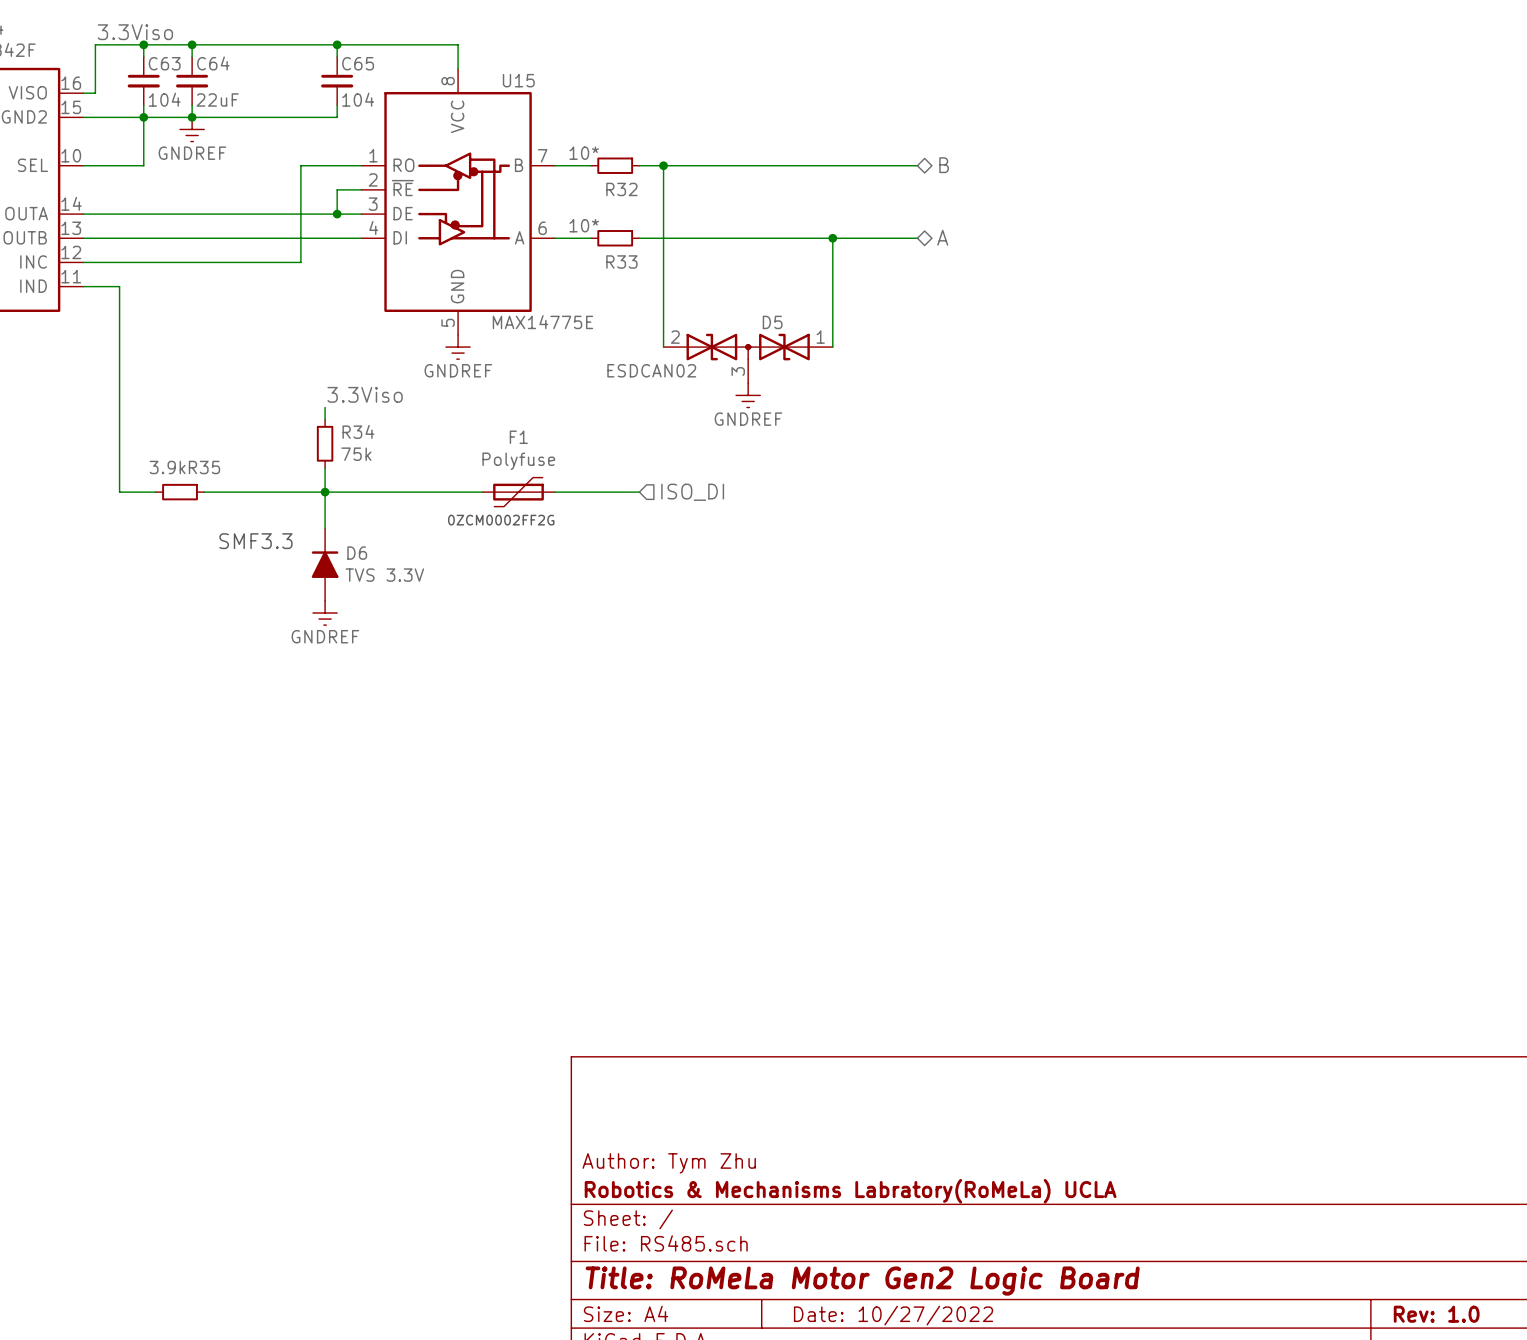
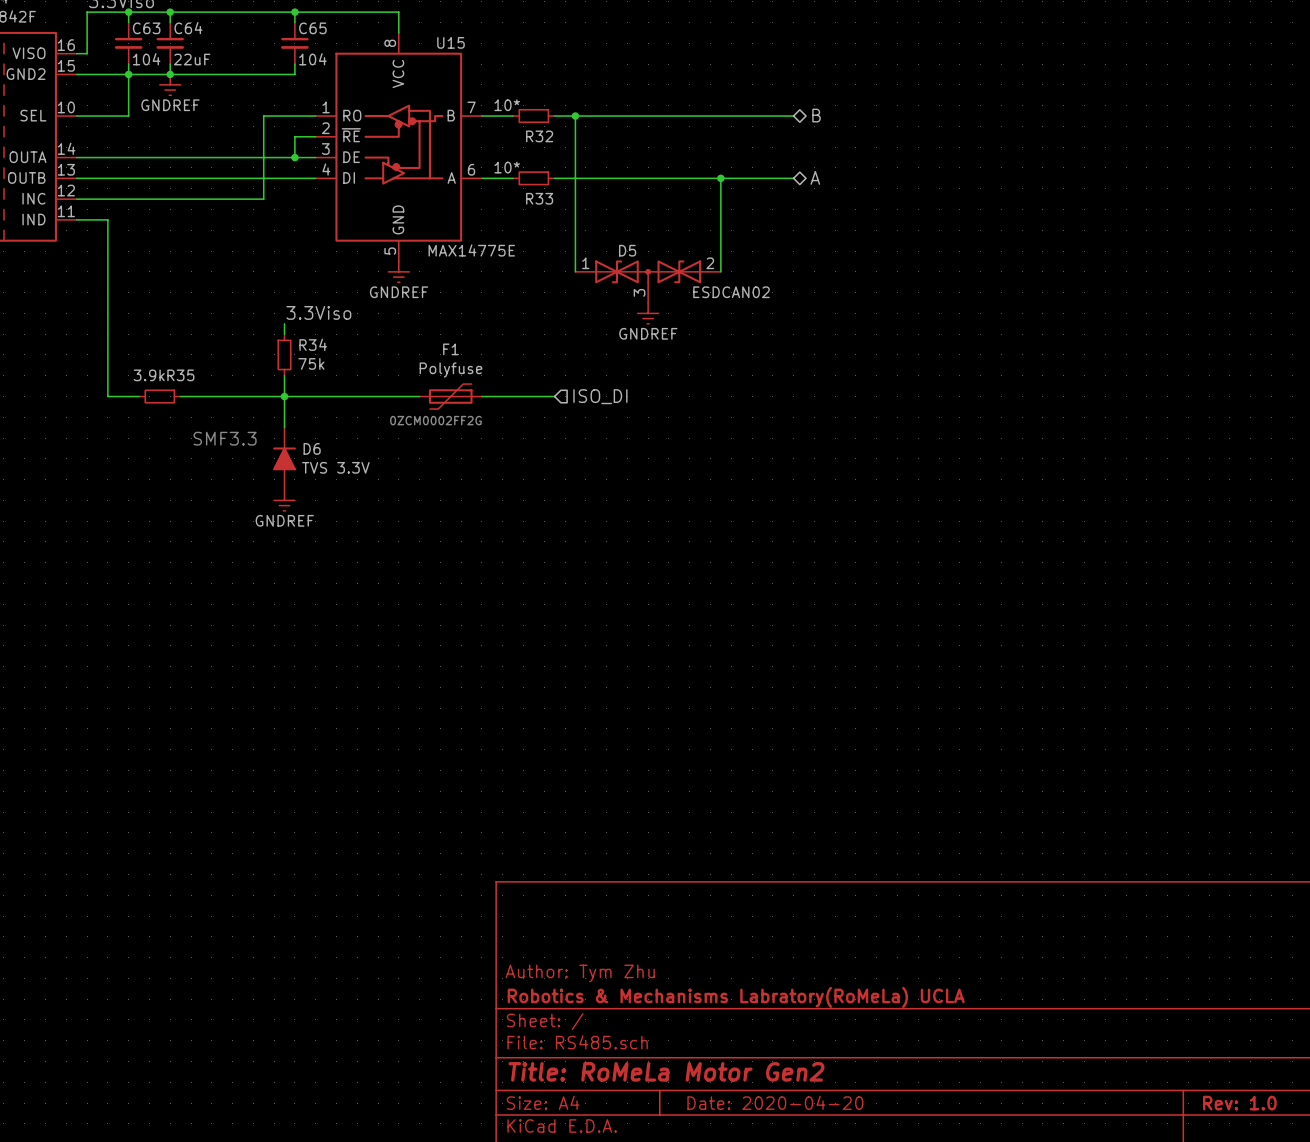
D5 flip: as is (748, 347) -> left-right (648, 271)
title block: Title: RoMeLa Motor Gen2 Logic Board (862, 1281) -> Title: RoMeLa Motor Gen2 (666, 1071)
title block: Date: 10/27/2022 (893, 1315) -> Date: 2020-04-20 (775, 1102)

